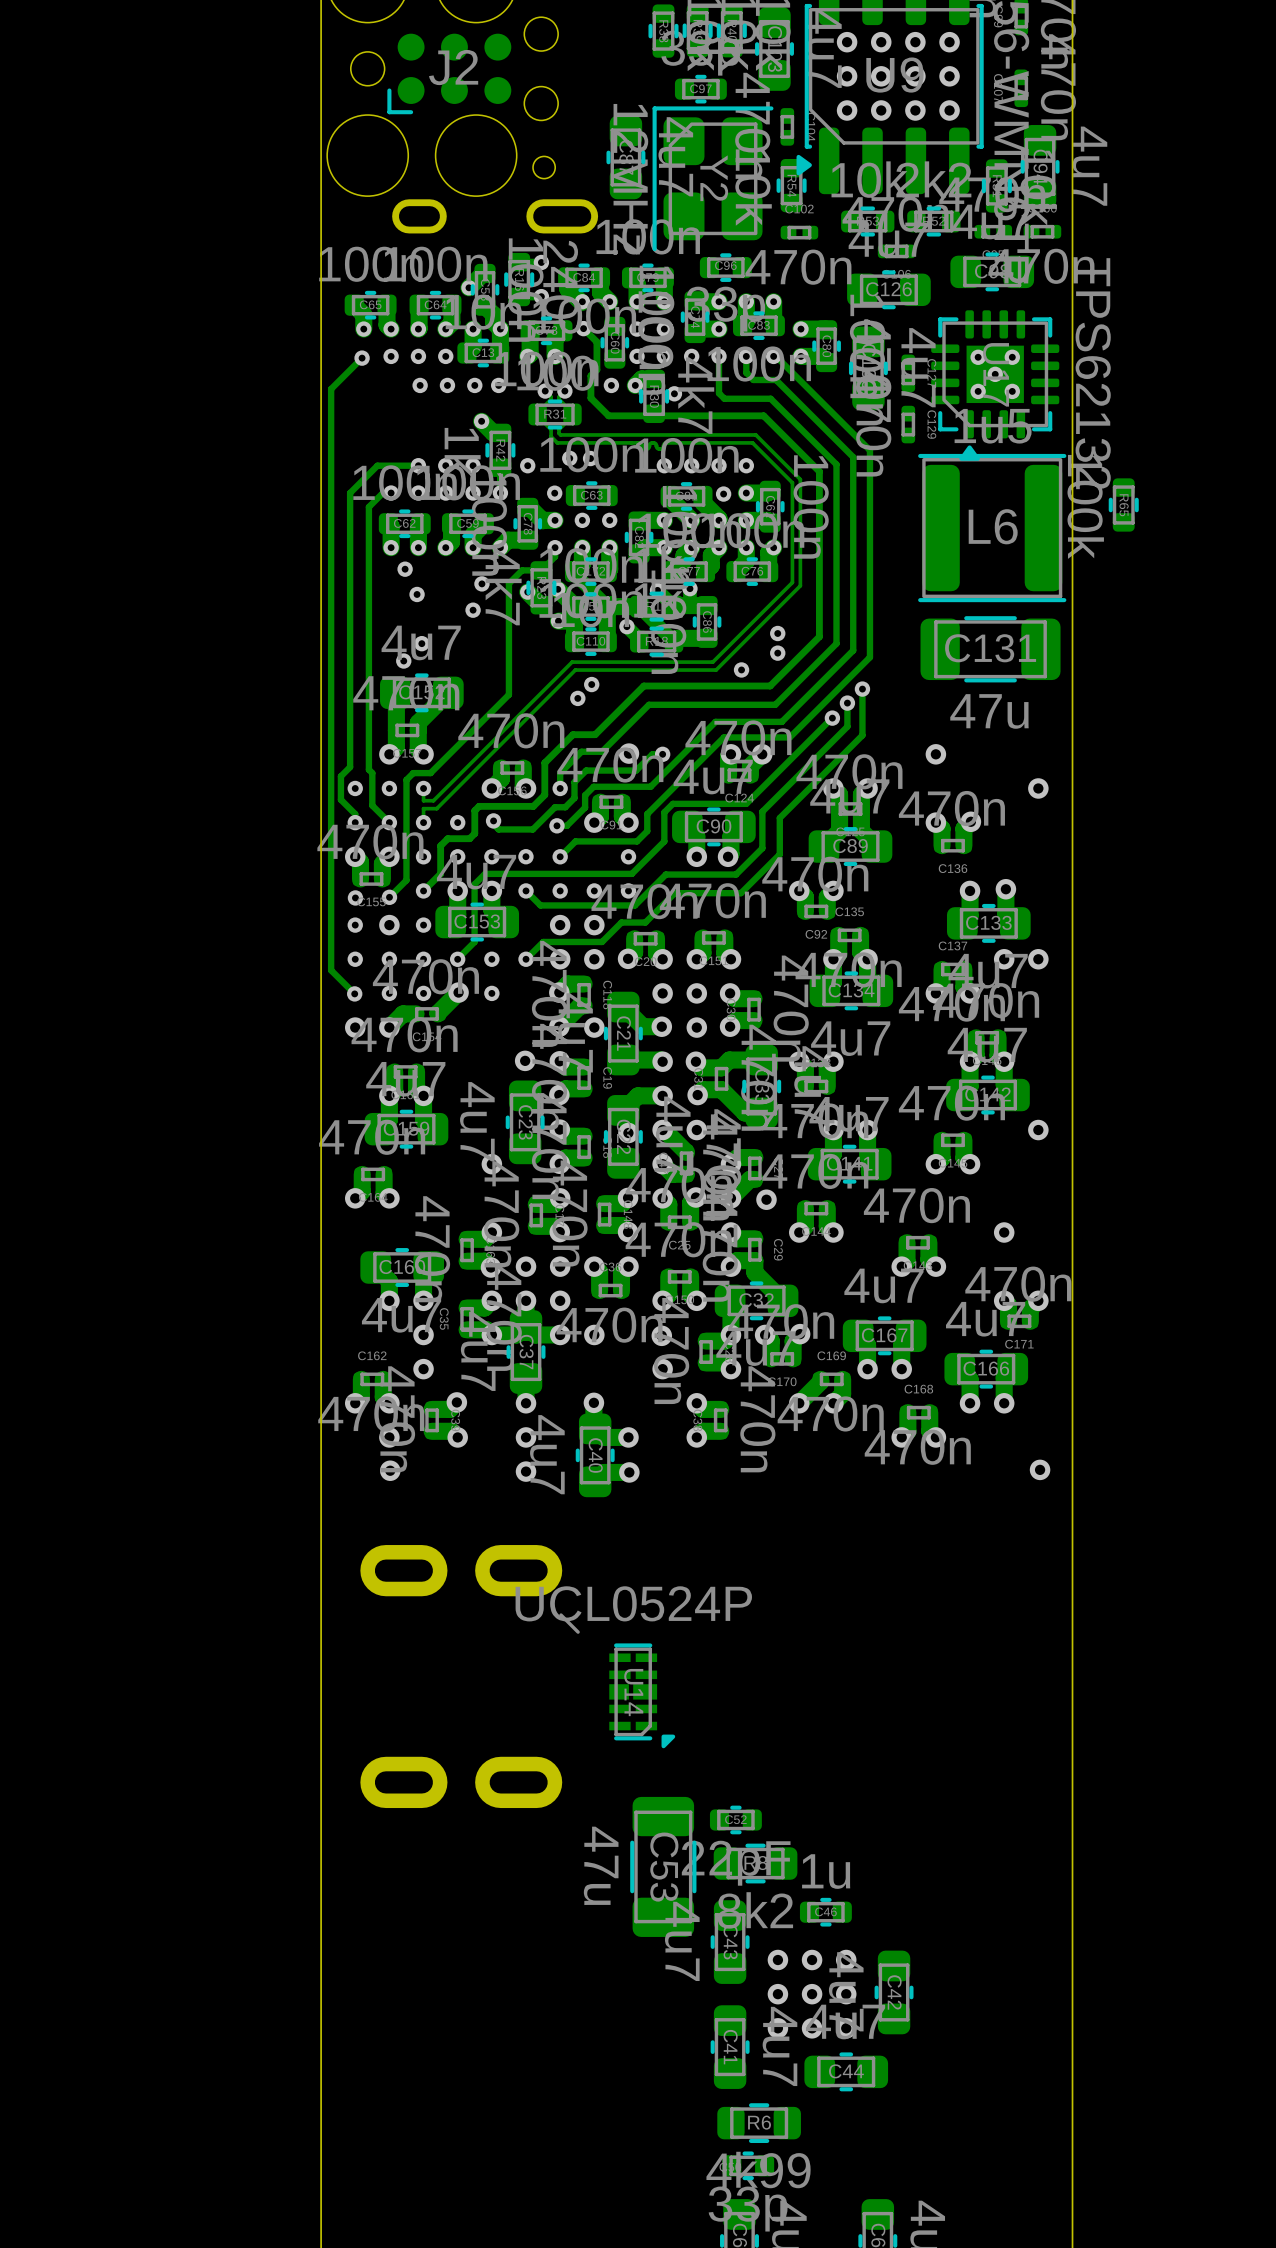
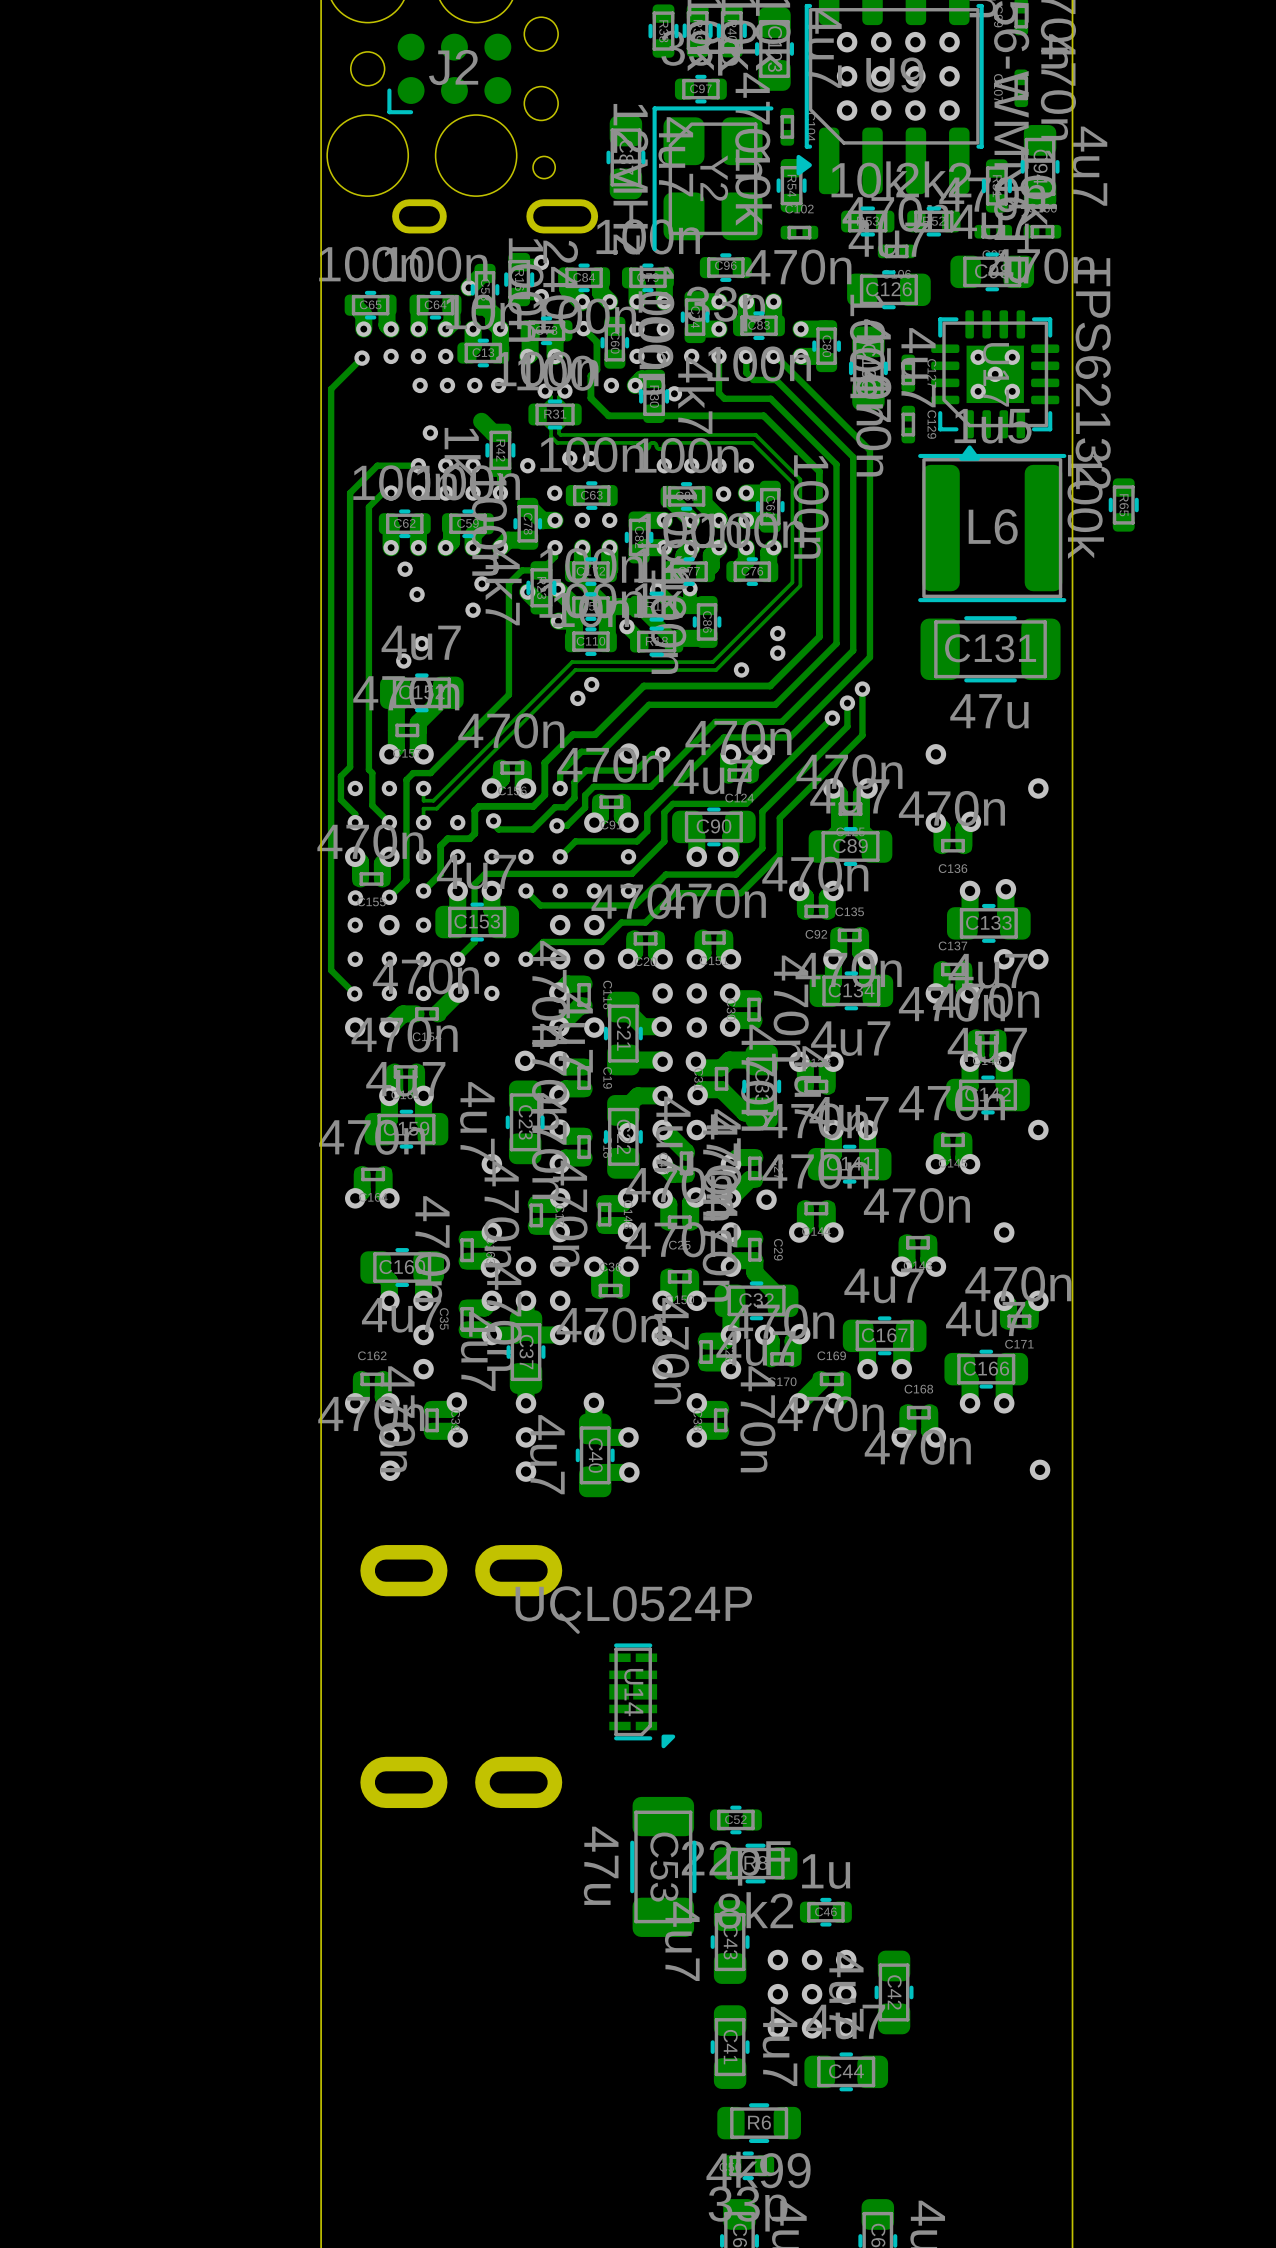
via position: (481, 421) -> (430, 432)

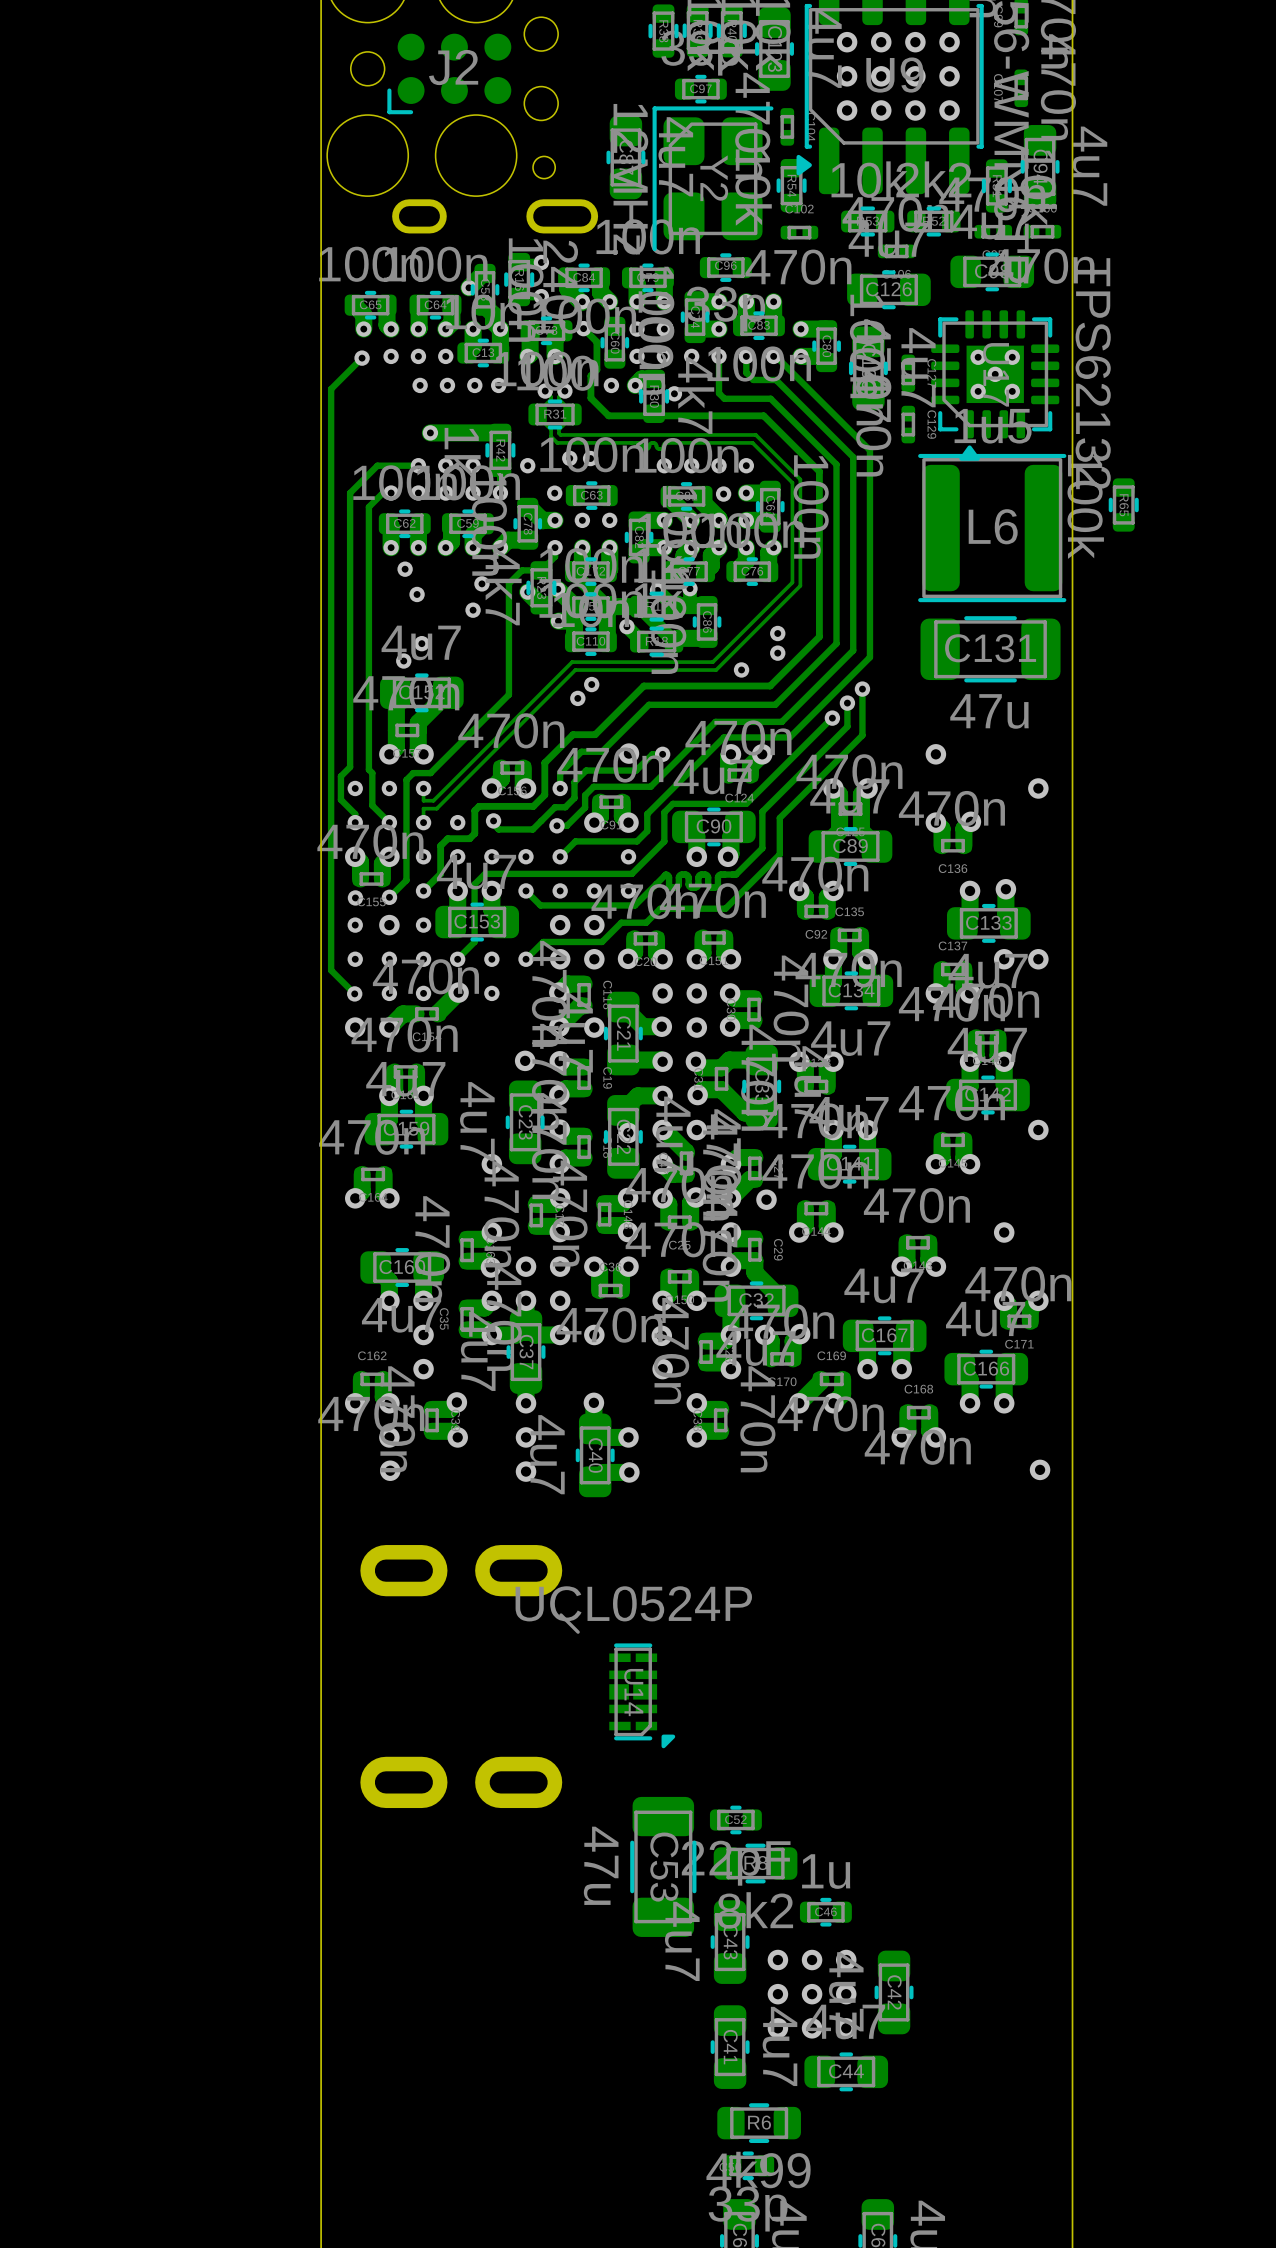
track: (481, 421) (493, 432) -> (430, 432) (493, 432)
track: (682, 874) (665, 874) -> (682, 874) (679, 876) (678, 885) (675, 887) (669, 886) (668, 876) (665, 874)
track: (701, 874) (685, 874) -> (701, 874) (698, 876) (698, 885) (695, 887) (689, 886) (688, 876) (685, 874)
track: (721, 874) (704, 874) -> (721, 874) (718, 876) (717, 885) (714, 887) (708, 886) (707, 876) (704, 874)
track: (741, 893) (674, 893) (645, 922) (621, 922) -> (741, 893) (725, 908) (660, 908) (646, 922) (621, 922)

